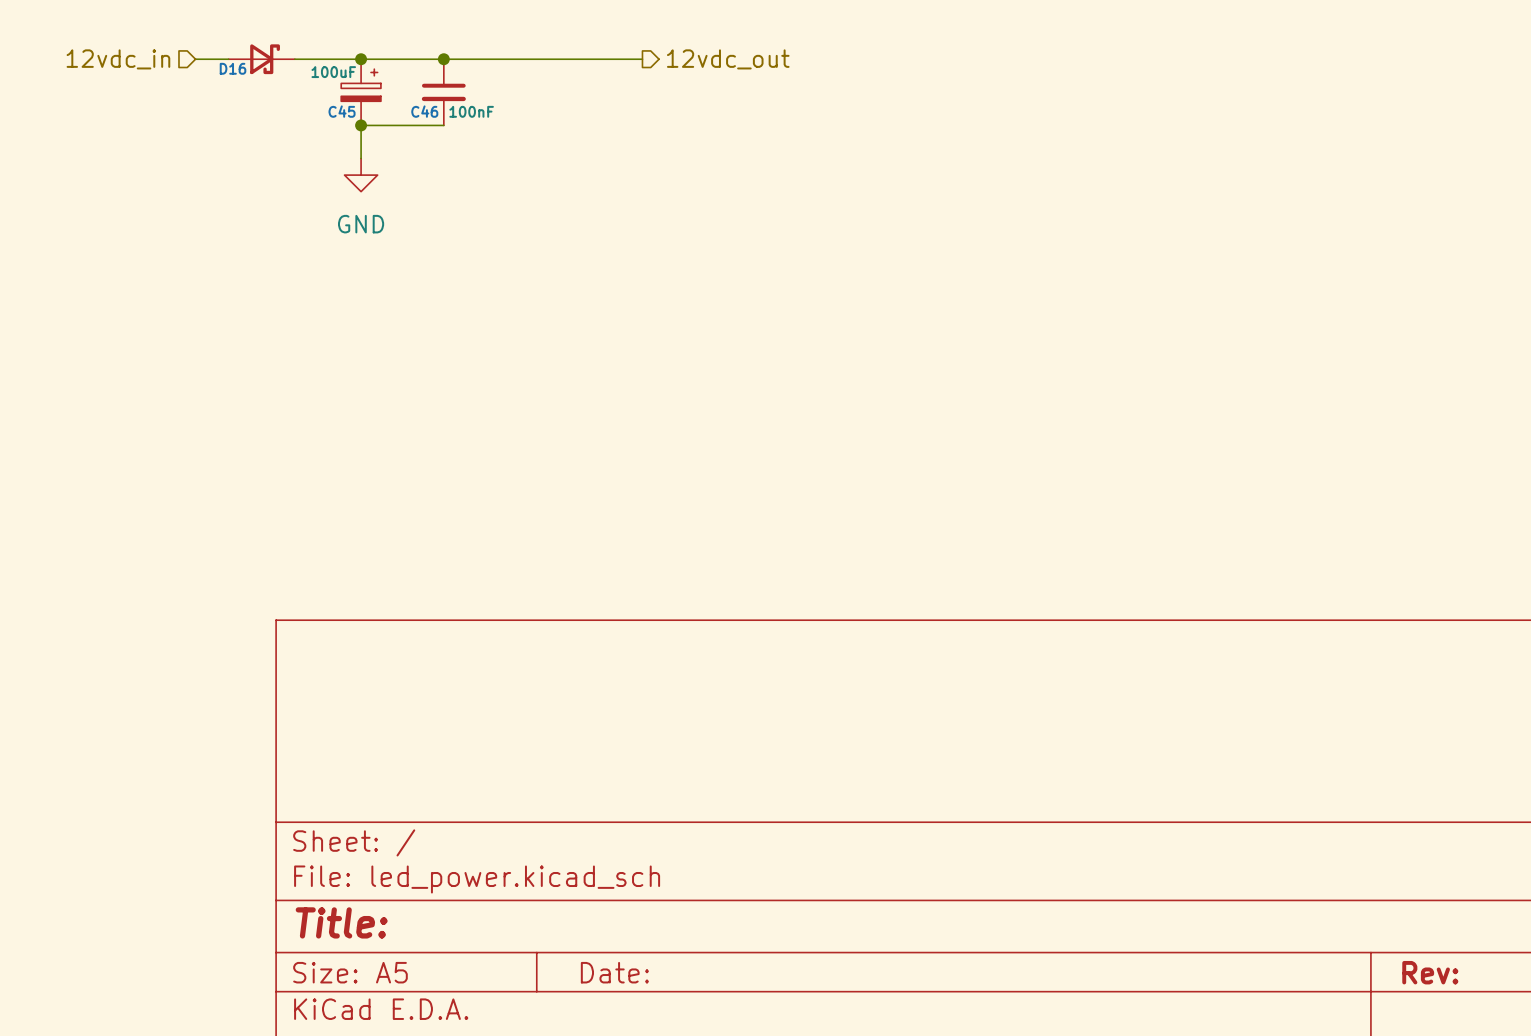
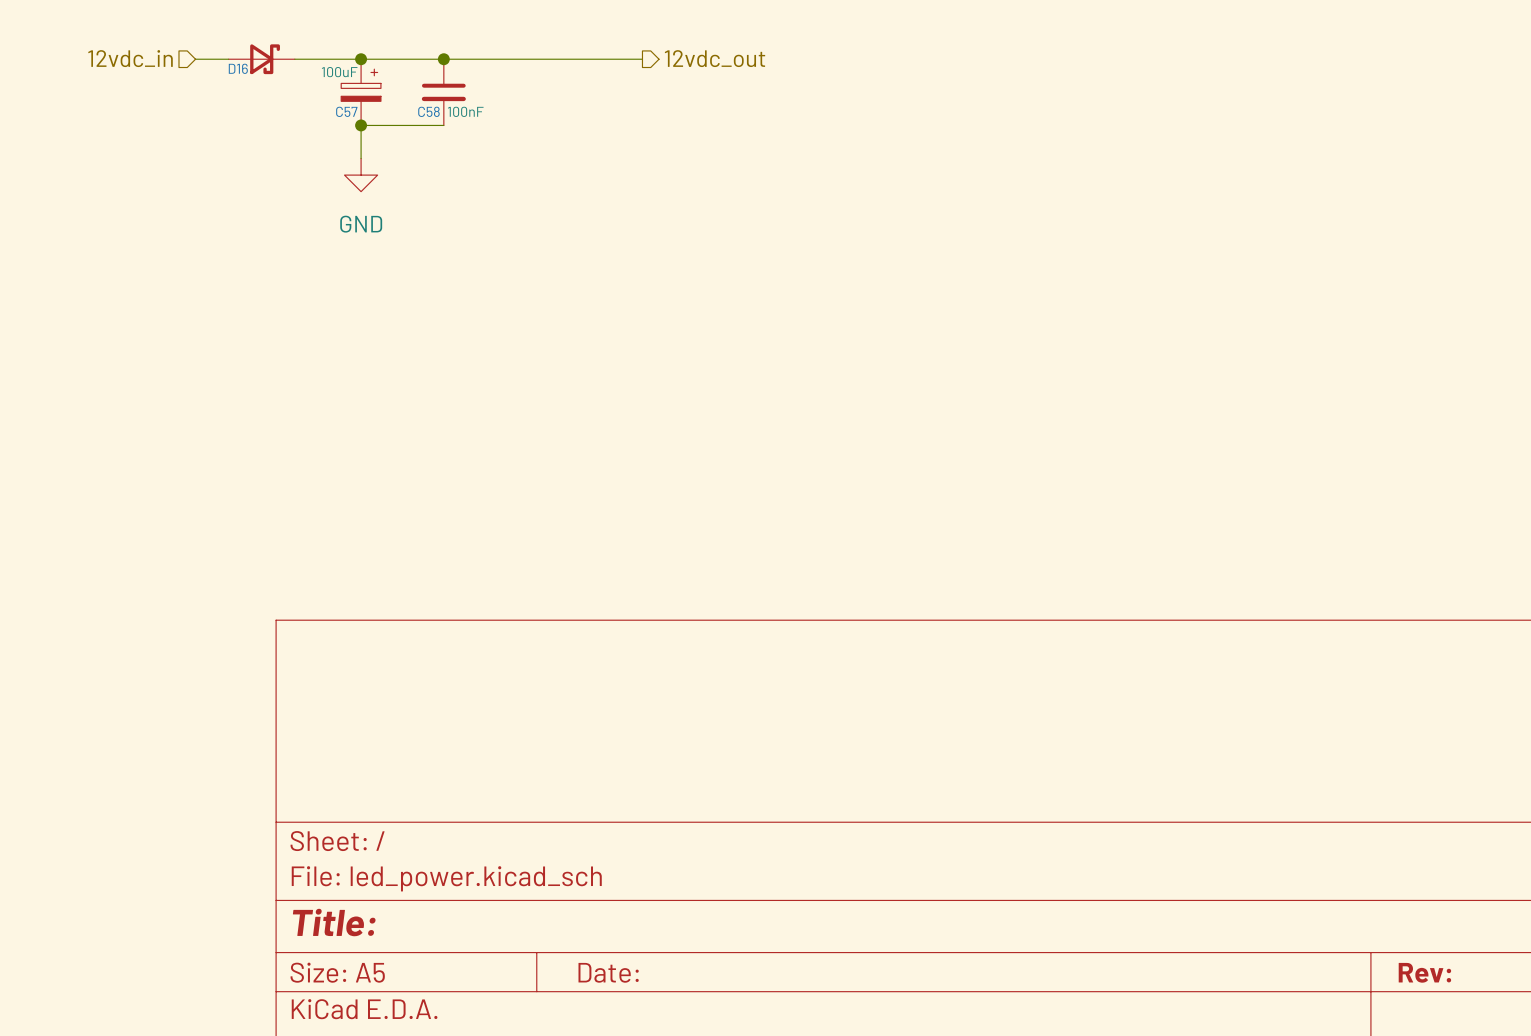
C45 name: C45 (342, 111) -> C57 (346, 111)
C46 name: C46 (424, 111) -> C58 (428, 111)

